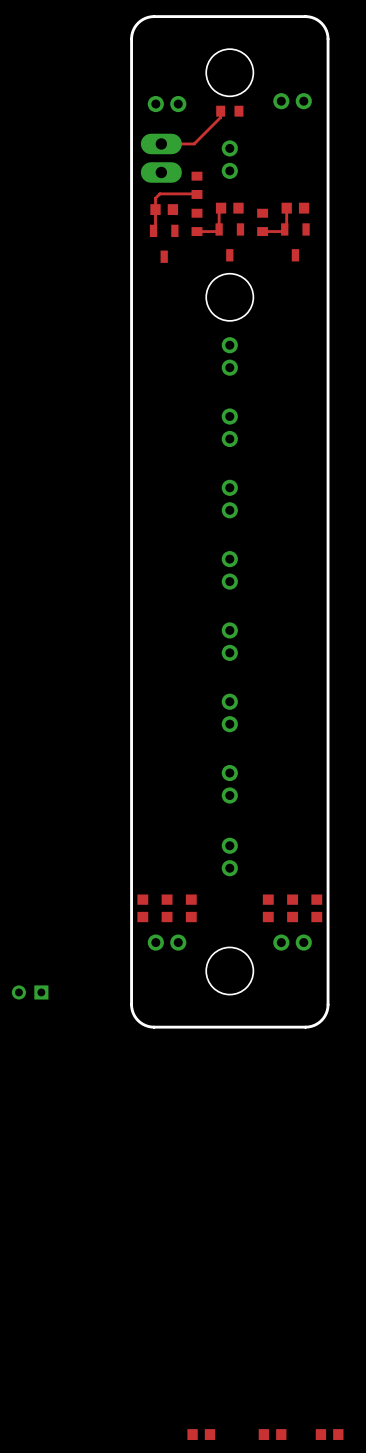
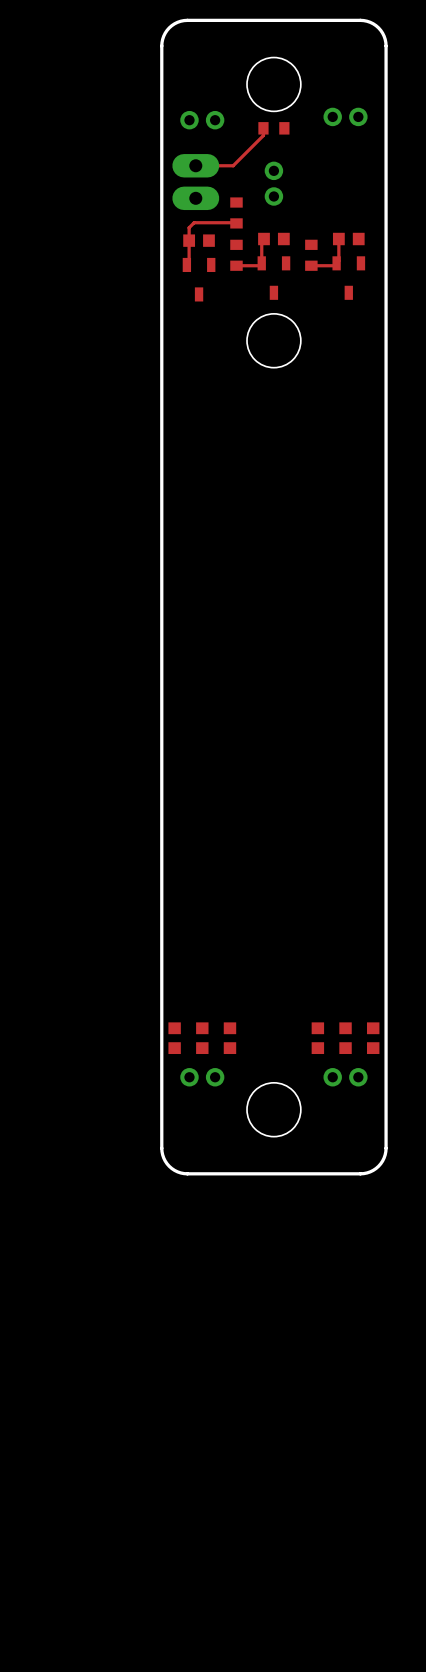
part: (229, 356) -> none
part: (229, 427) -> none
part: (229, 499) -> none
part: (229, 570) -> none
part: (229, 641) -> none
part: (229, 712) -> none
part: (229, 784) -> none
part: (229, 856) -> none
part: (30, 992) -> none
part: (201, 1434) -> none
part: (272, 1434) -> none
part: (329, 1434) -> none

